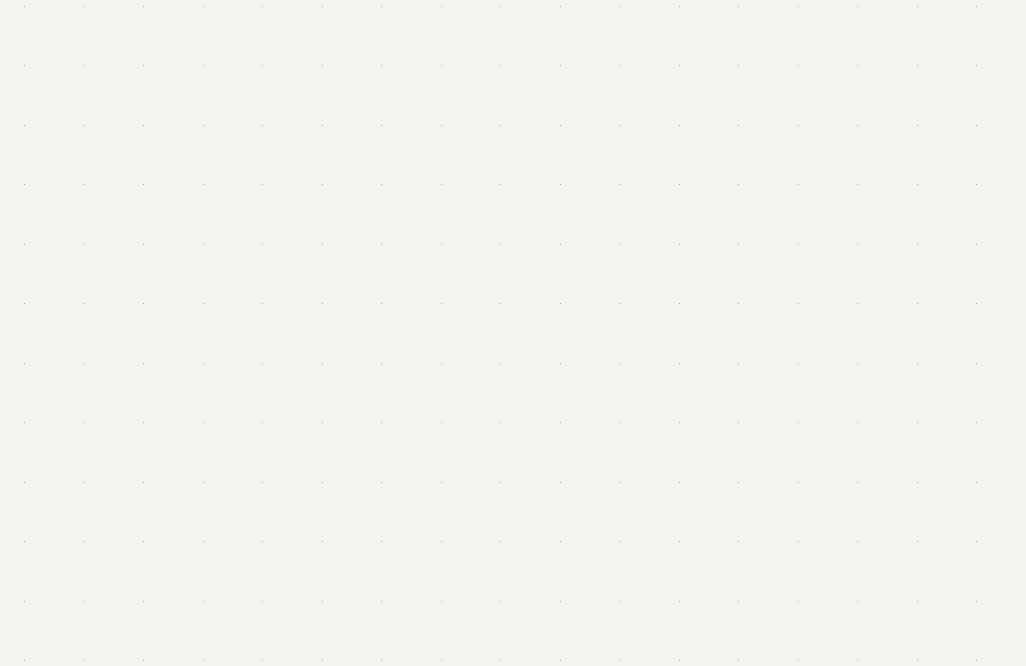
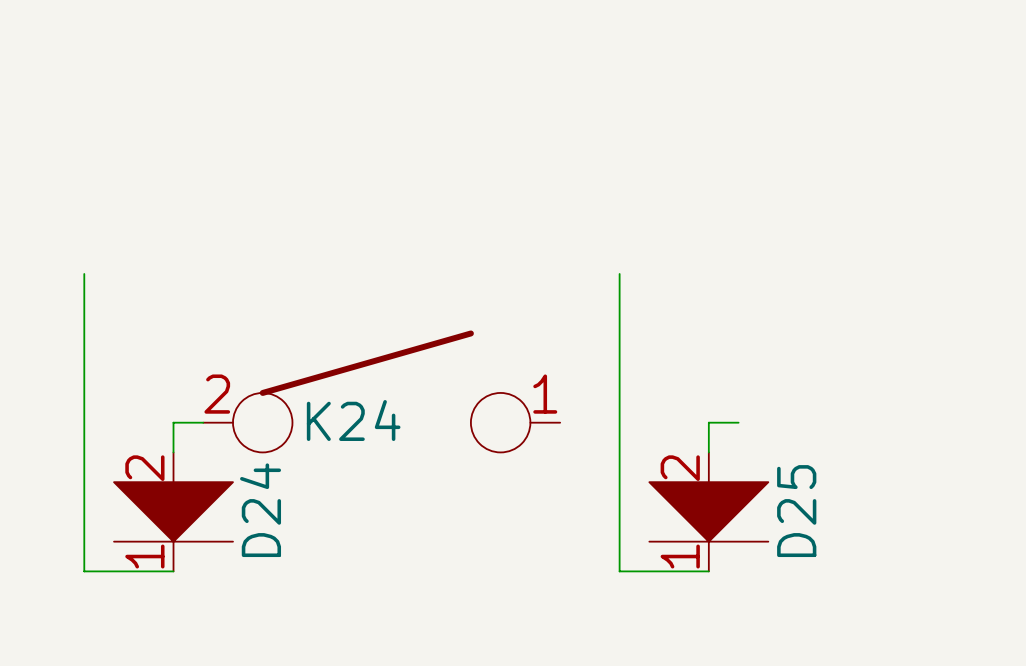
wire: none -> (84, 273) (84, 571) (173, 571)
wire: none -> (619, 273) (619, 571) (708, 571)
K24: none -> (381, 391)
wire: none -> (203, 422) (173, 422) (173, 452)
wire: none -> (738, 422) (708, 422) (708, 452)
D24: none -> (173, 511)
D25: none -> (708, 511)

